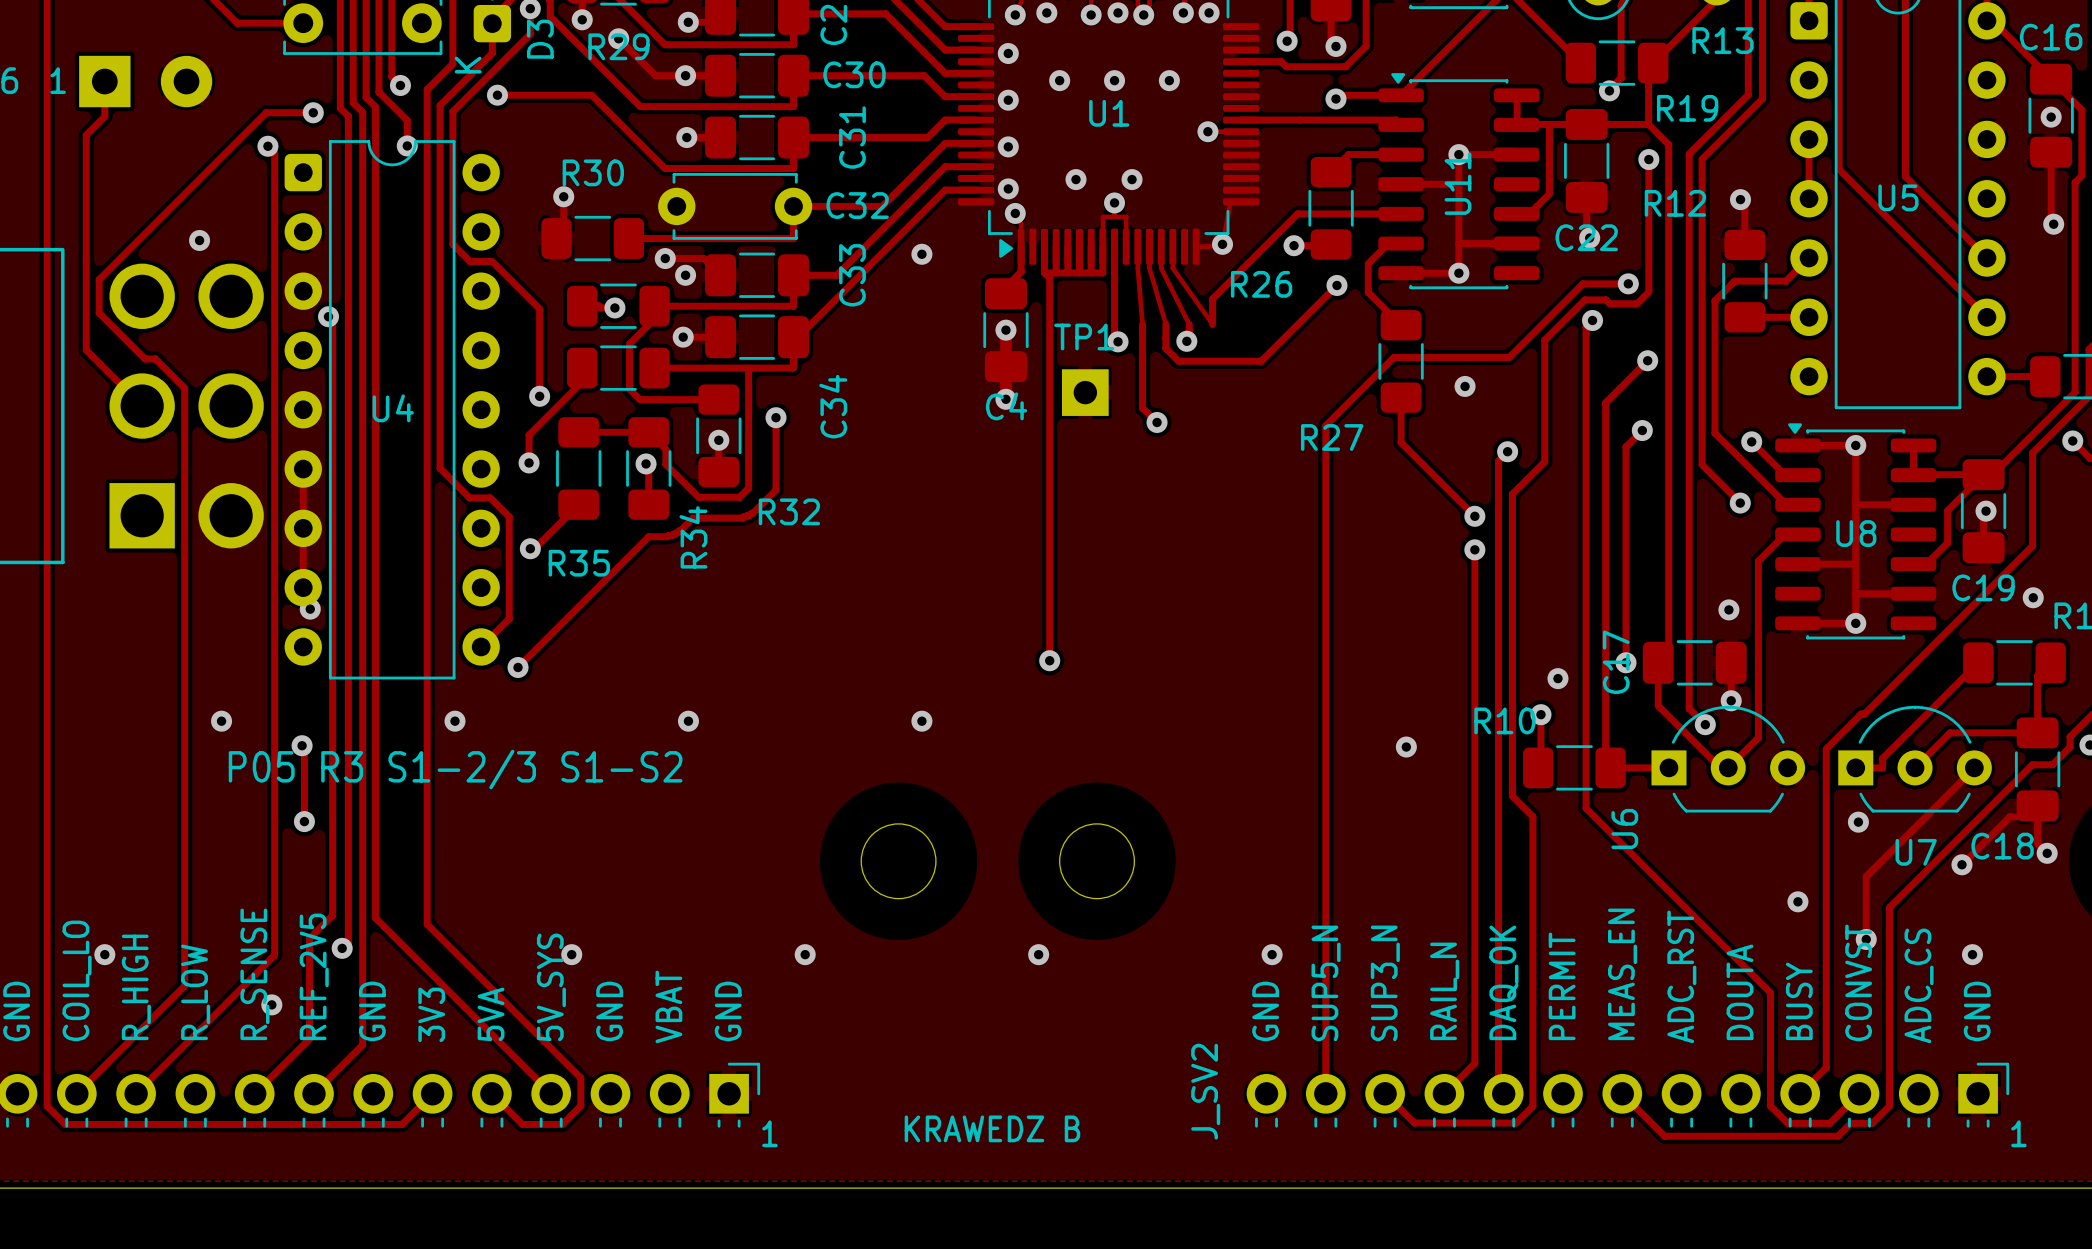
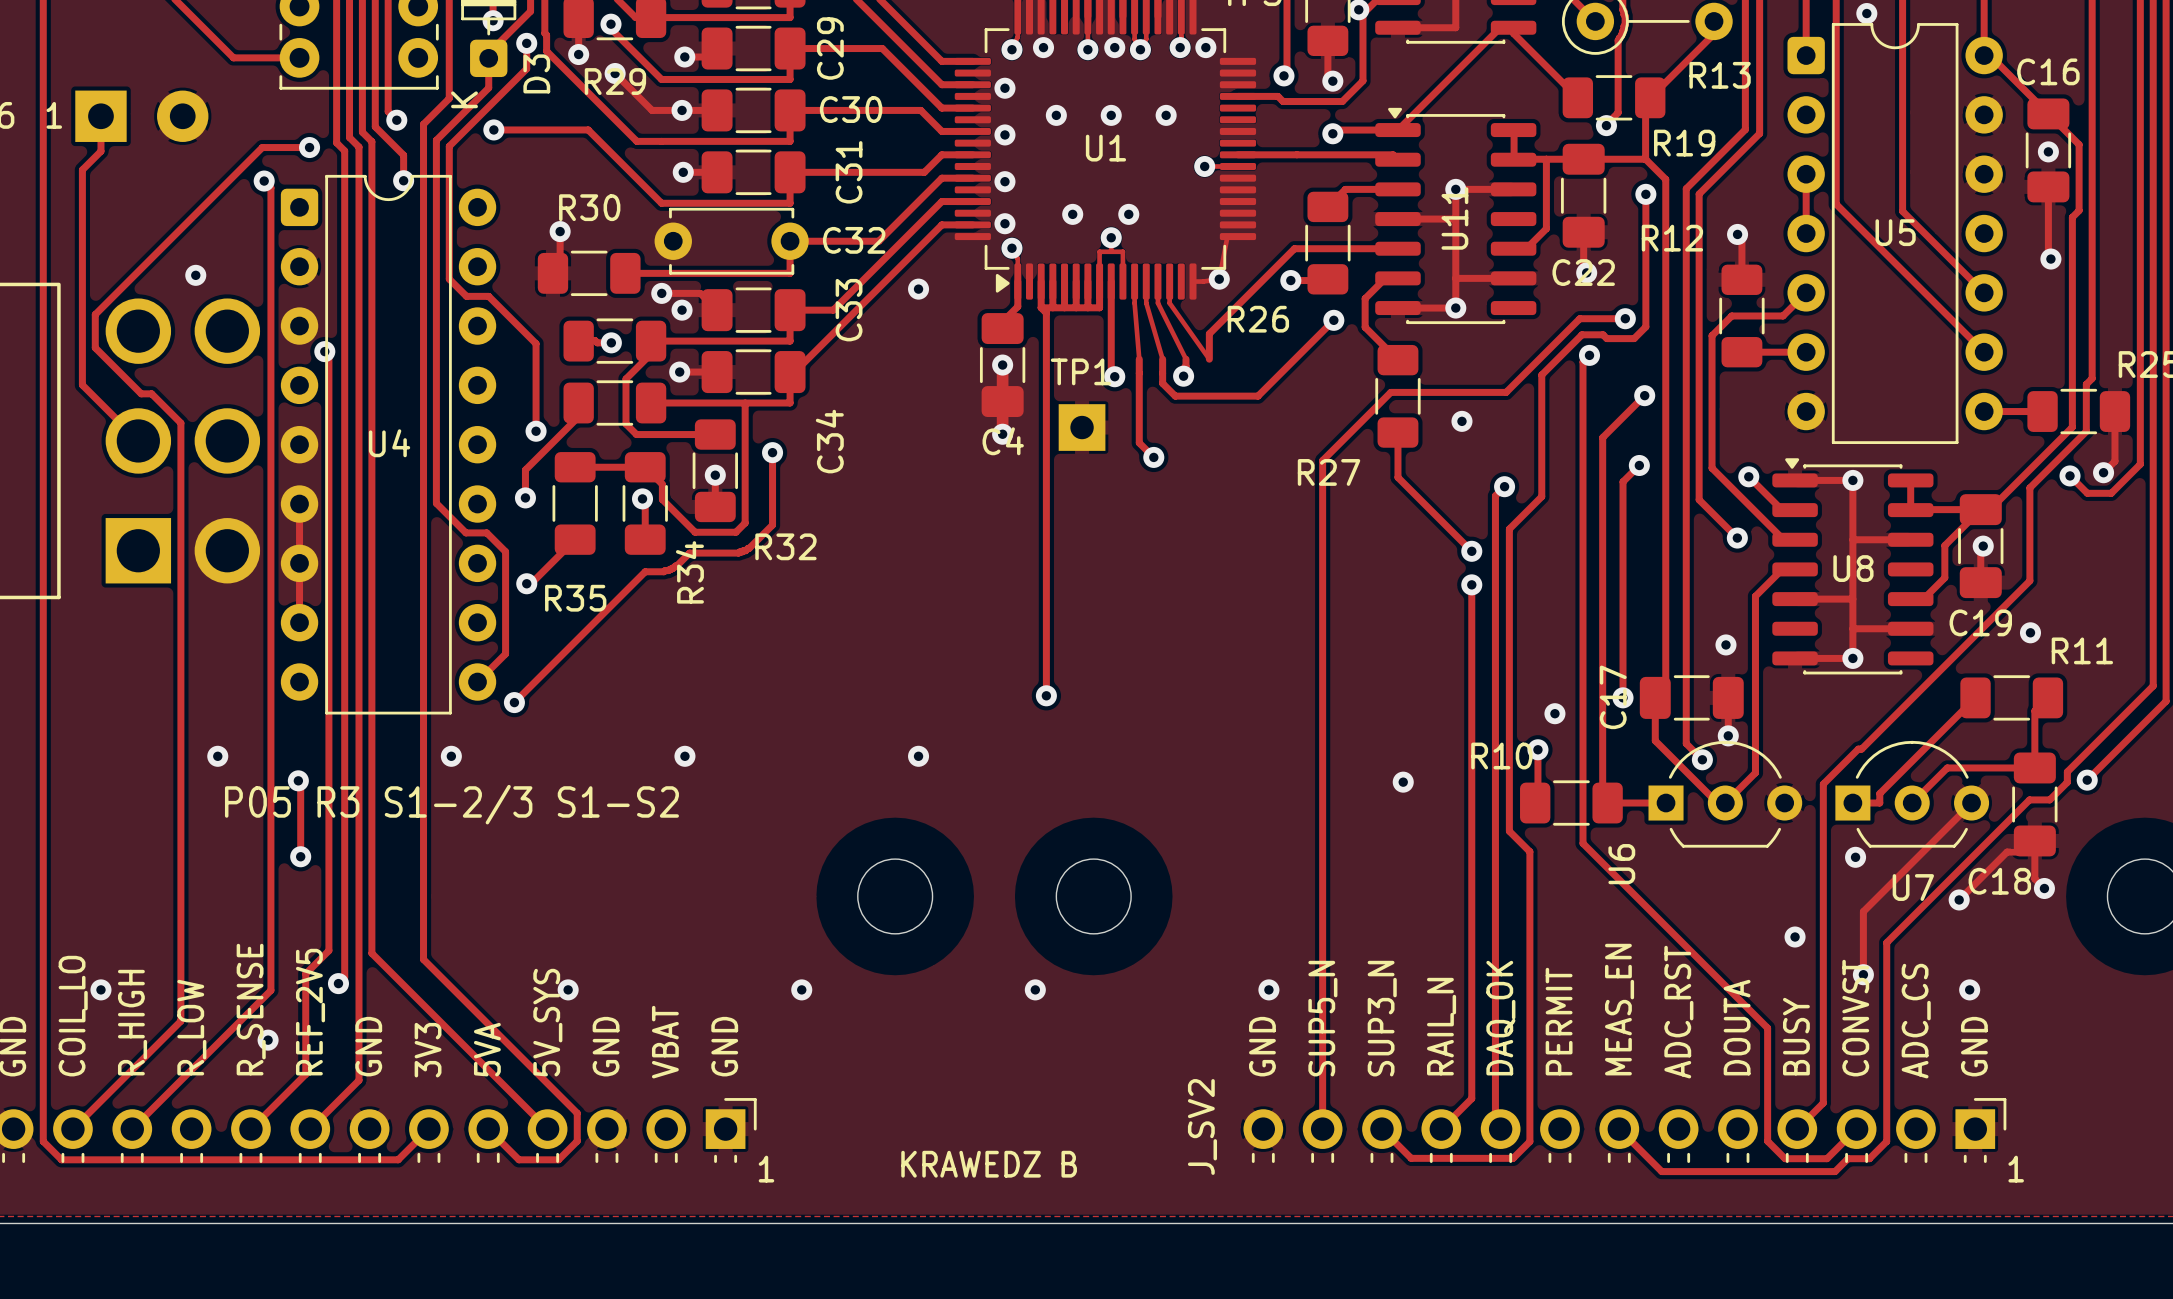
via: (310, 609) -> none

